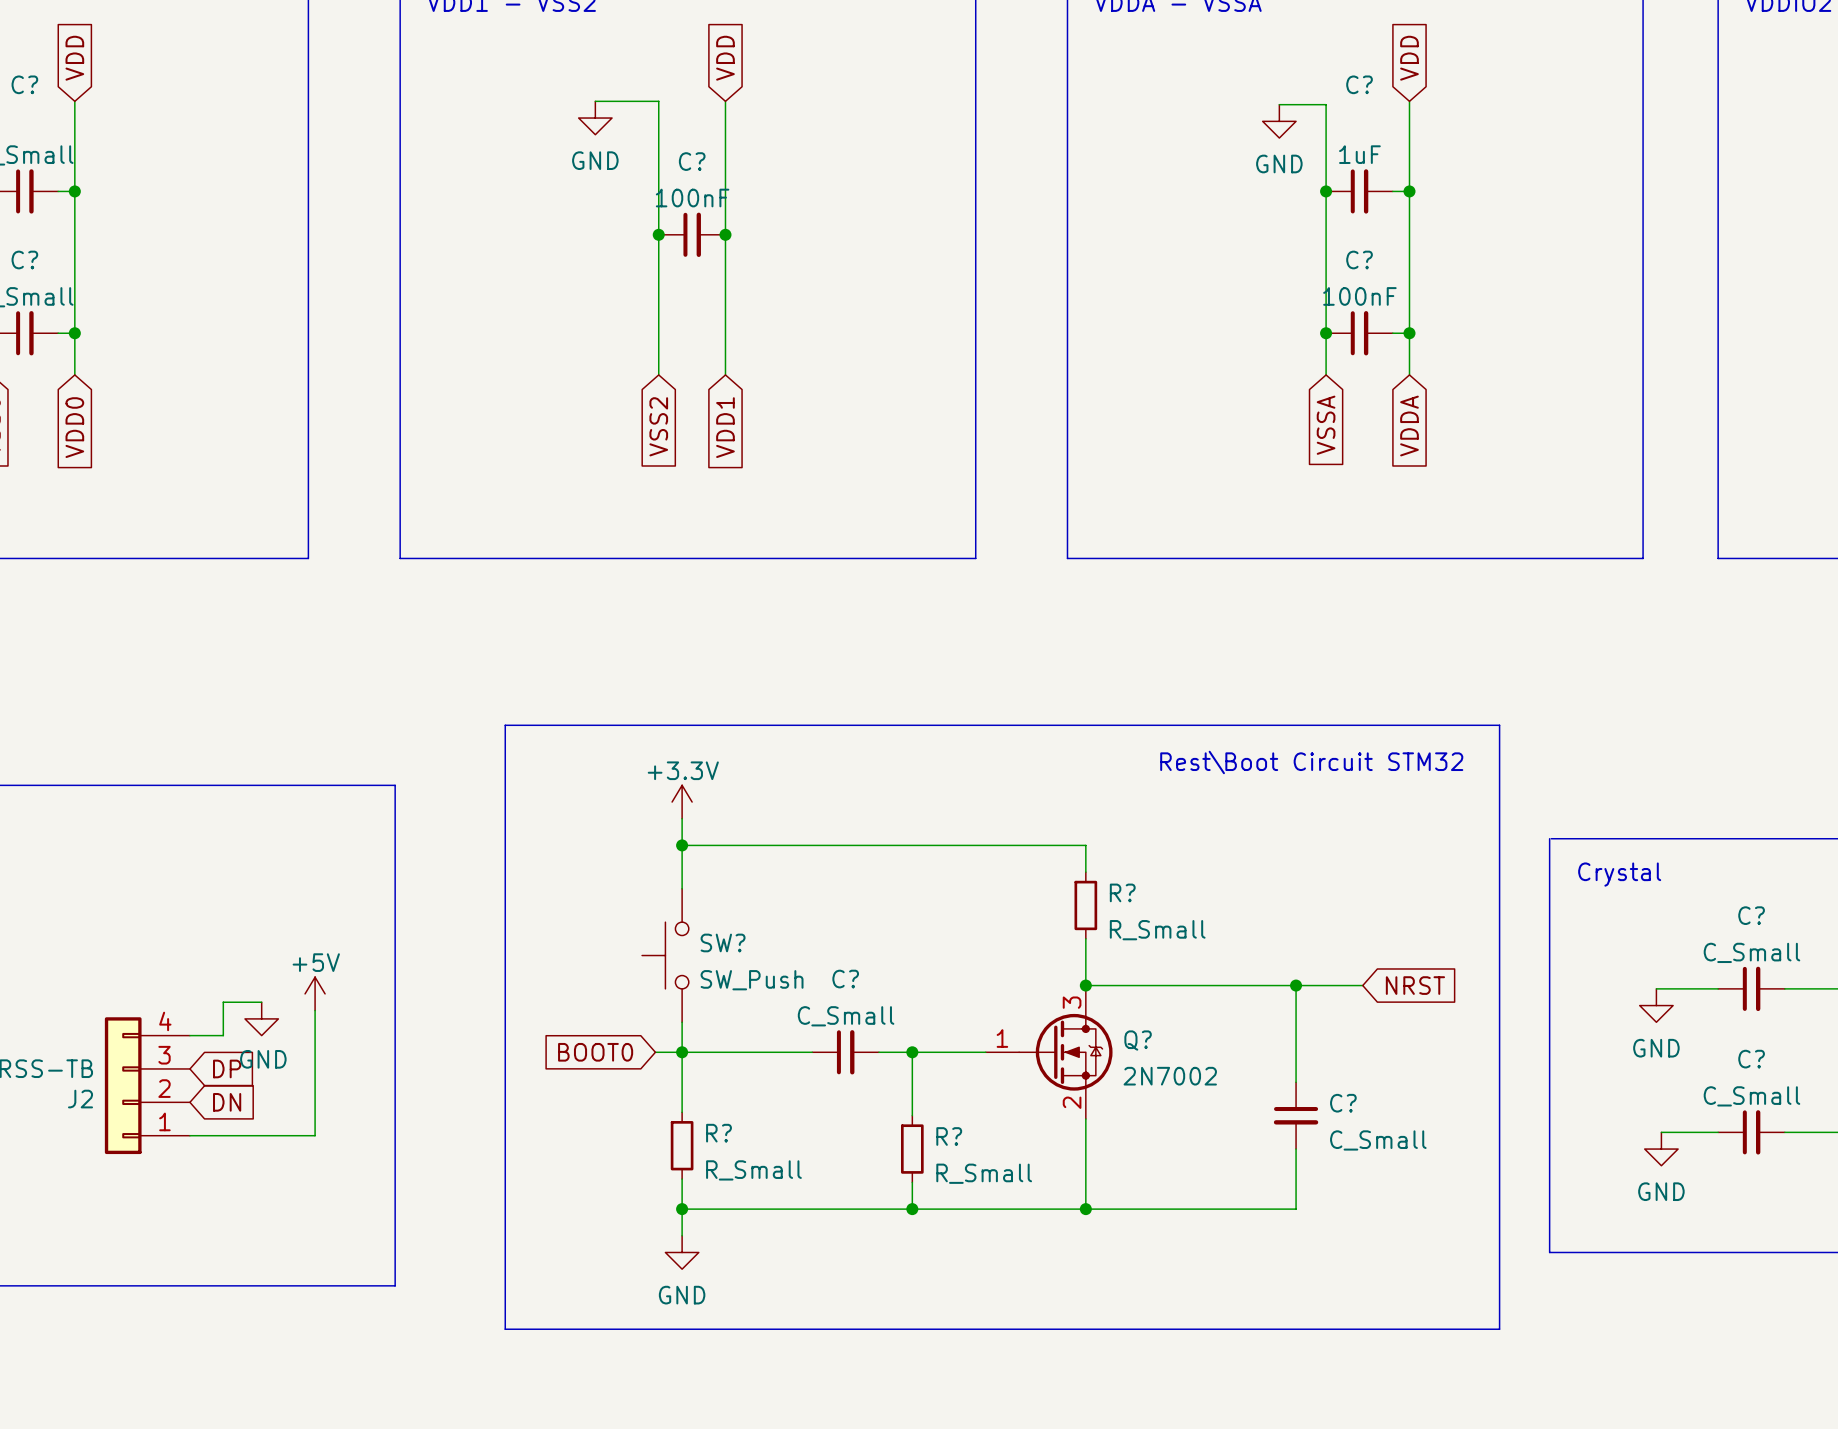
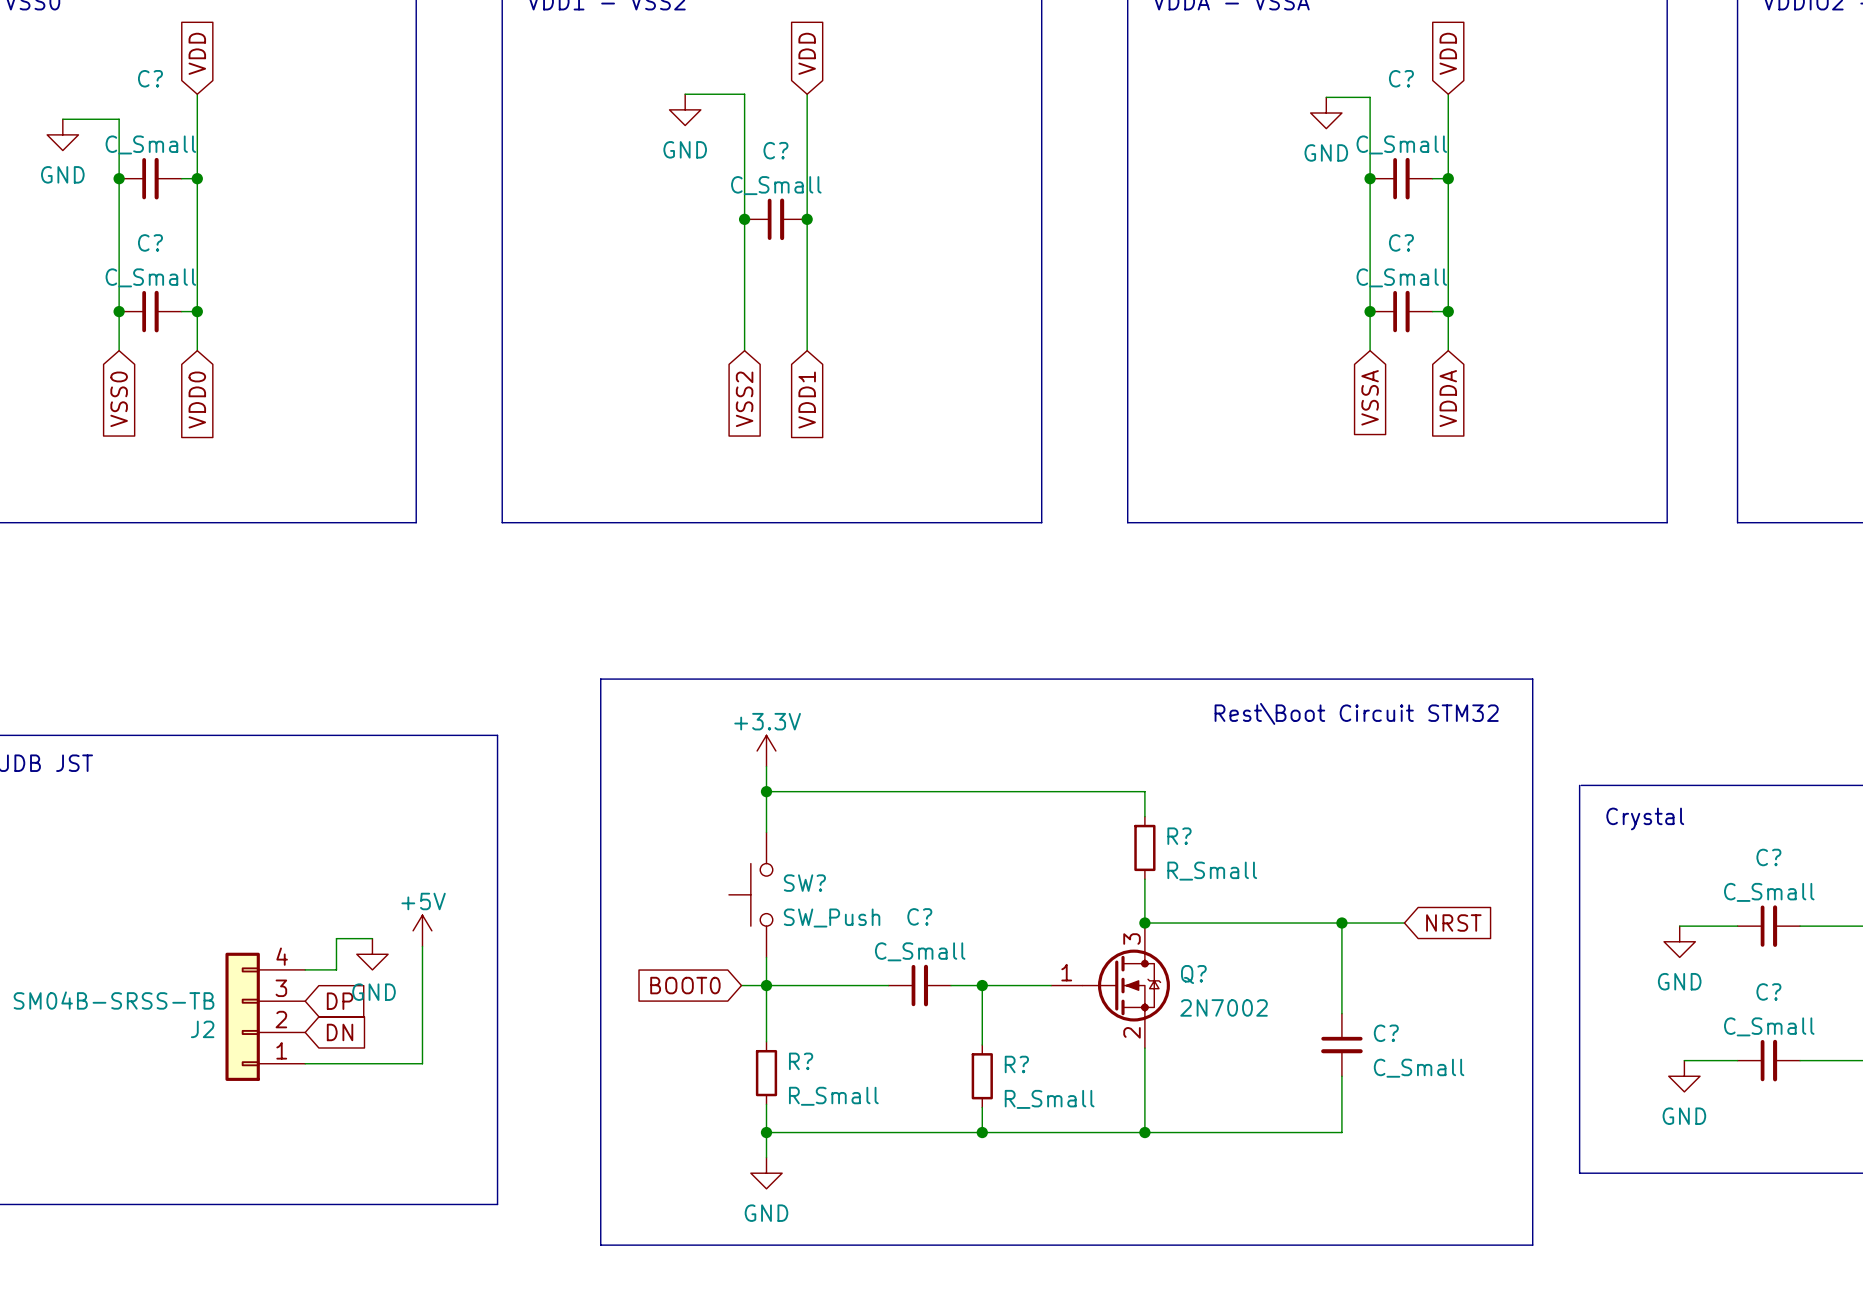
C? value: 1uF (1359, 154) -> C_Small (1401, 144)
C? value: 100nF (692, 198) -> C_Small (776, 185)
C? value: 100nF (1359, 296) -> C_Small (1401, 277)

